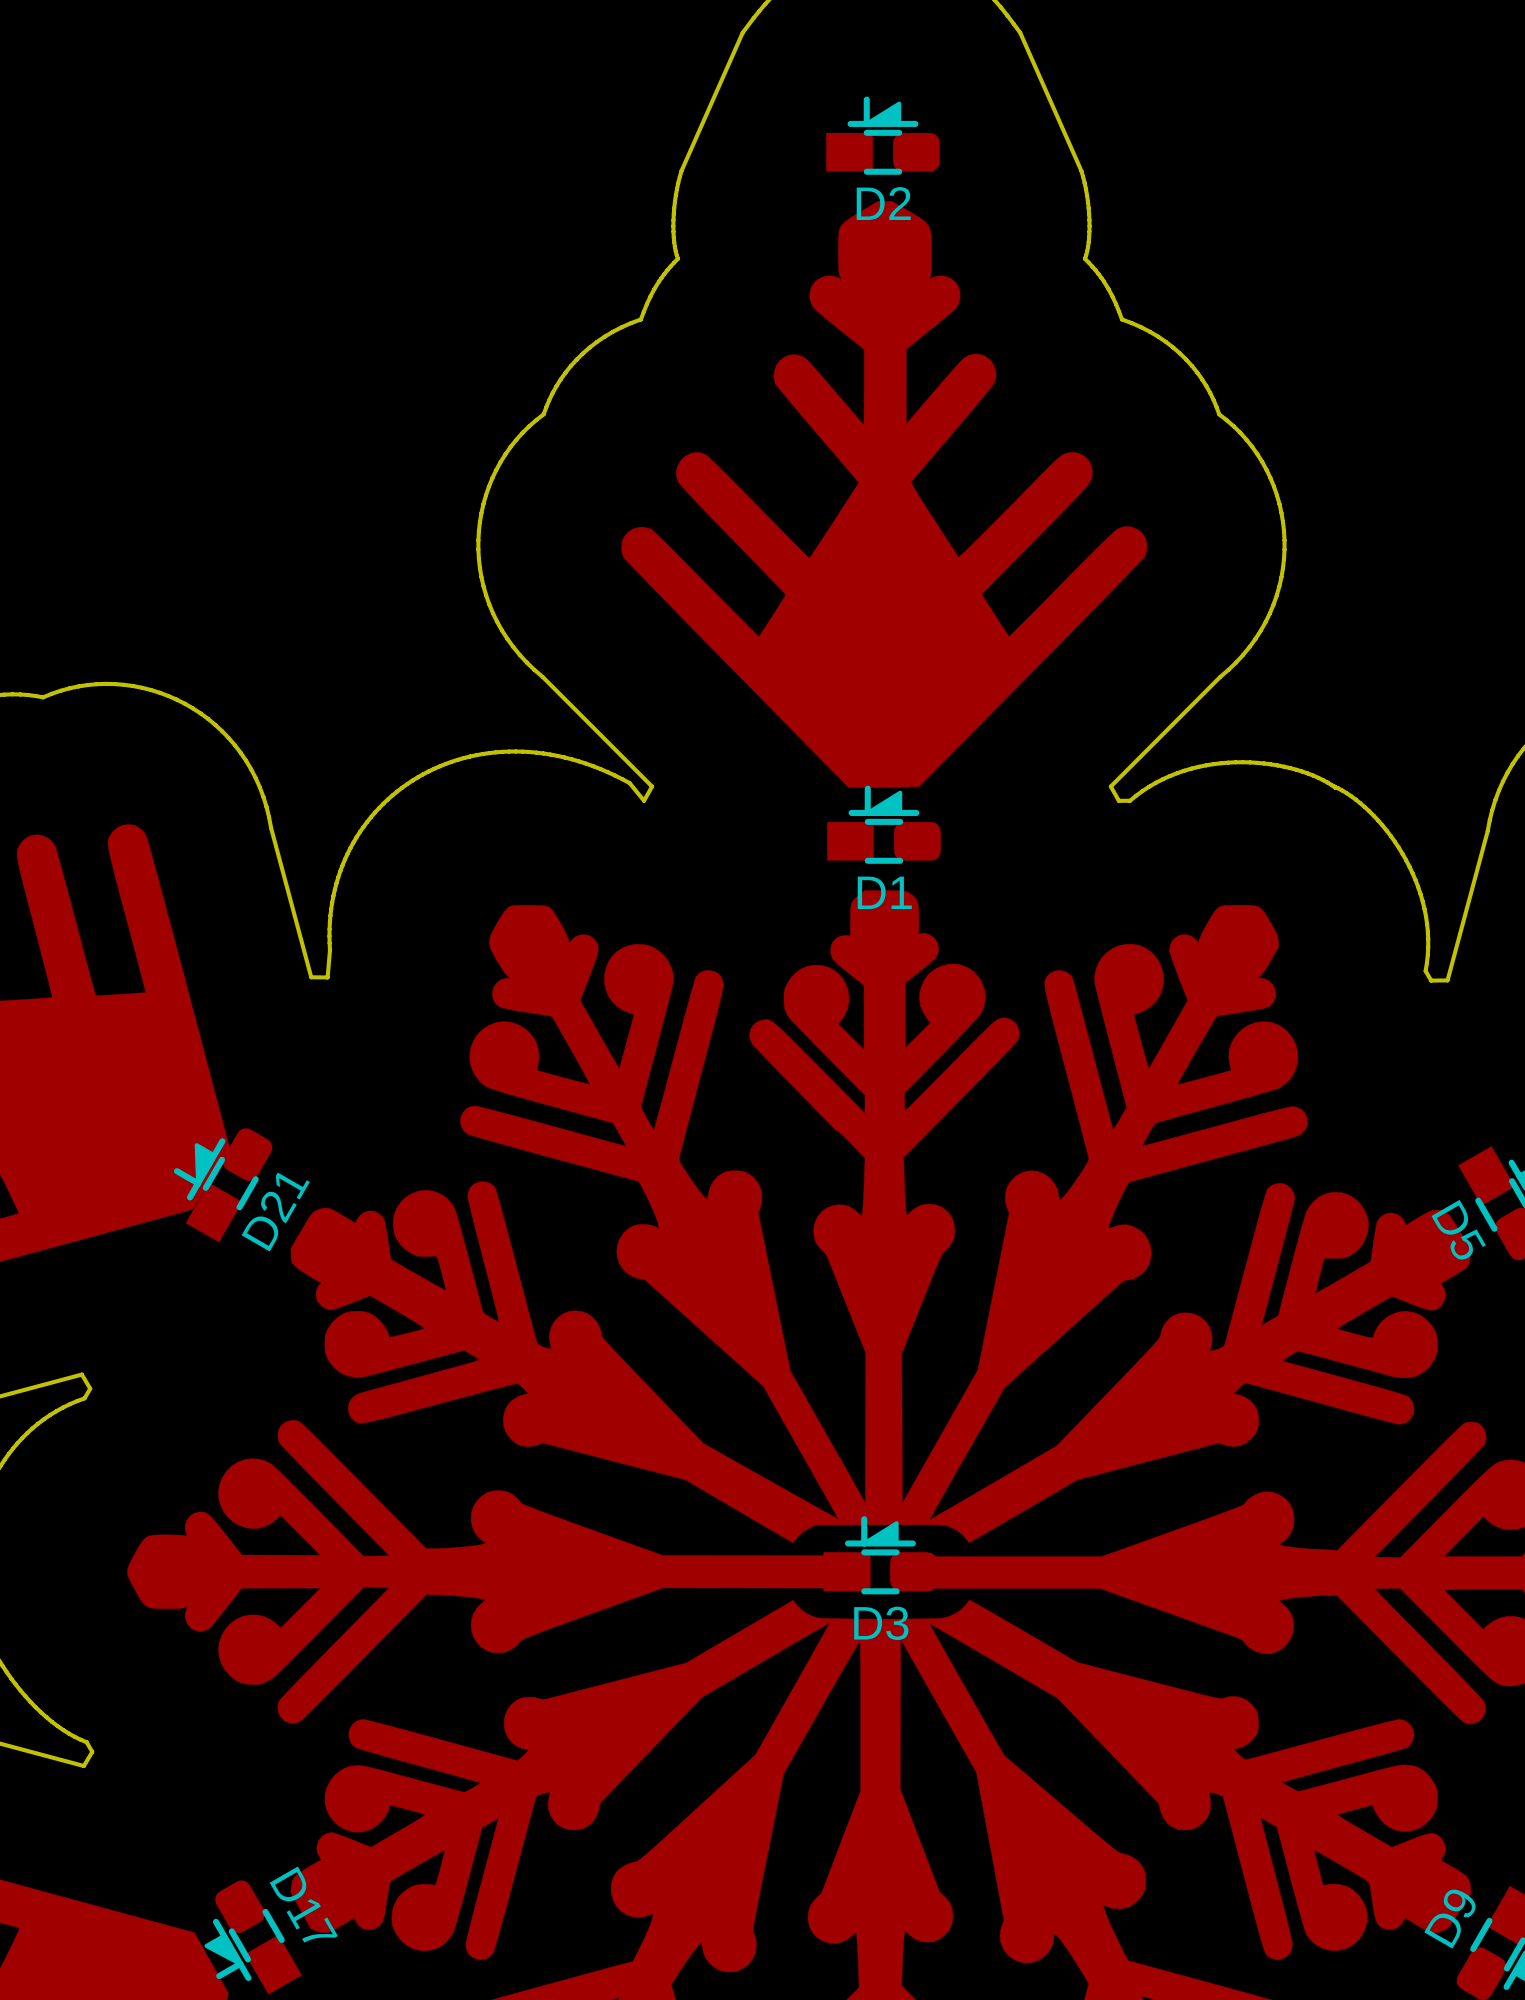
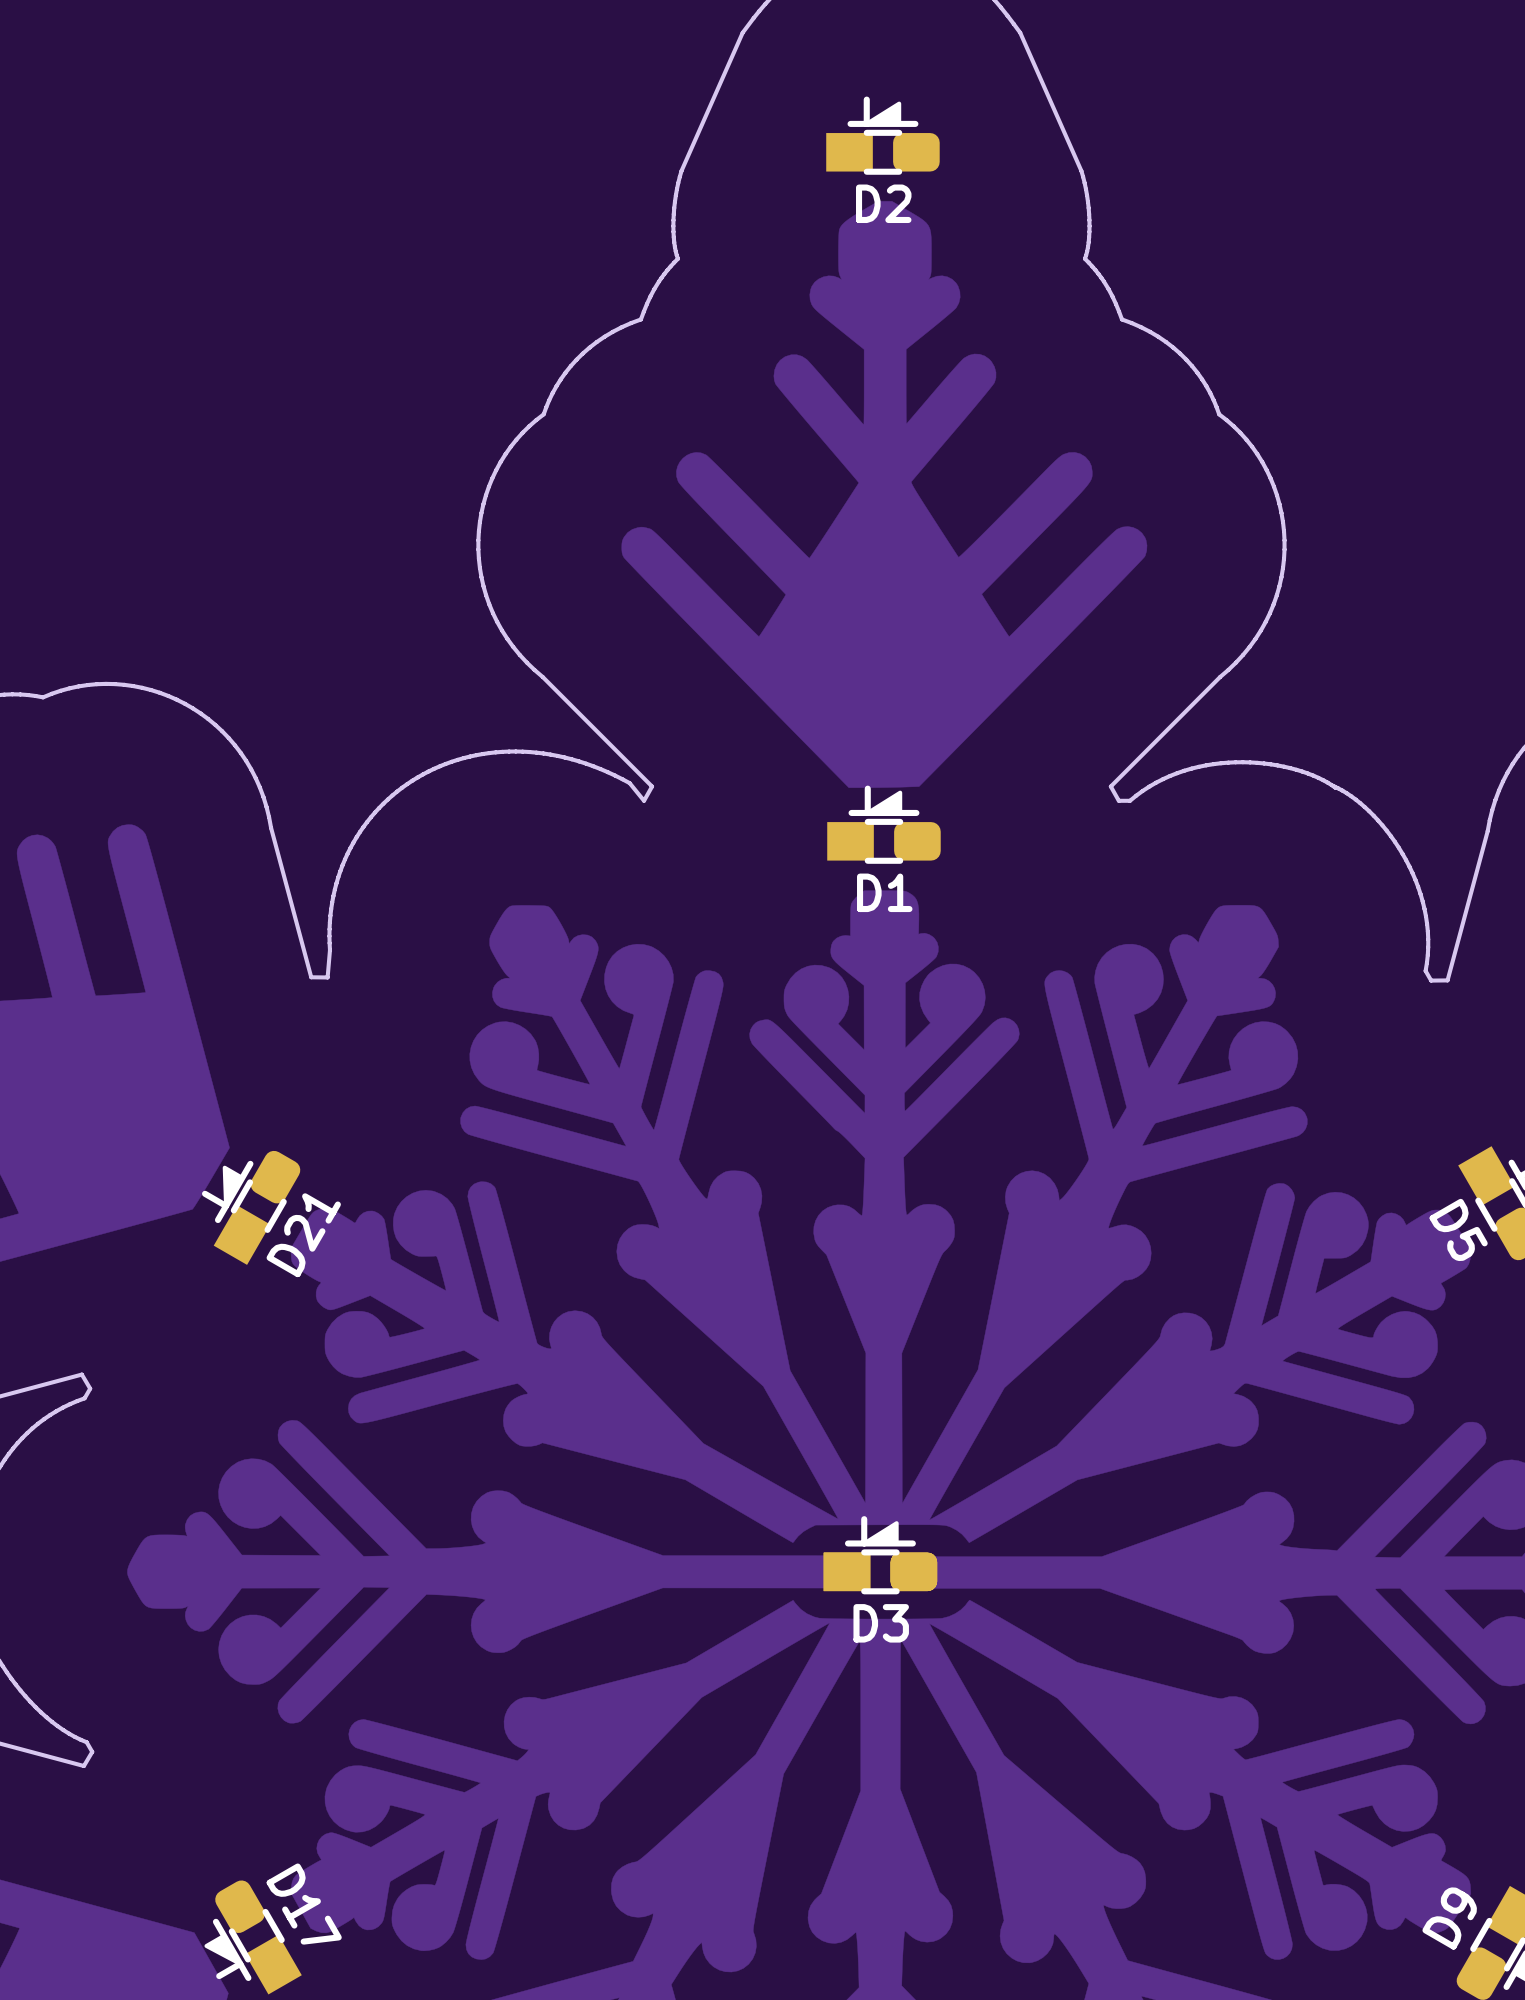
D21 position: (223, 1185) -> (251, 1207)

